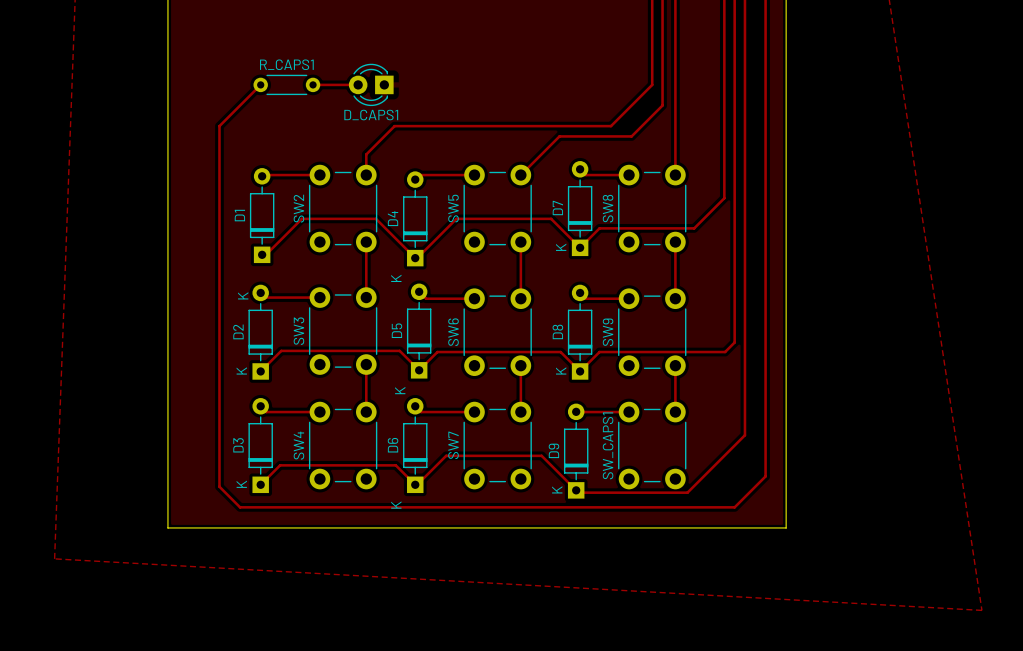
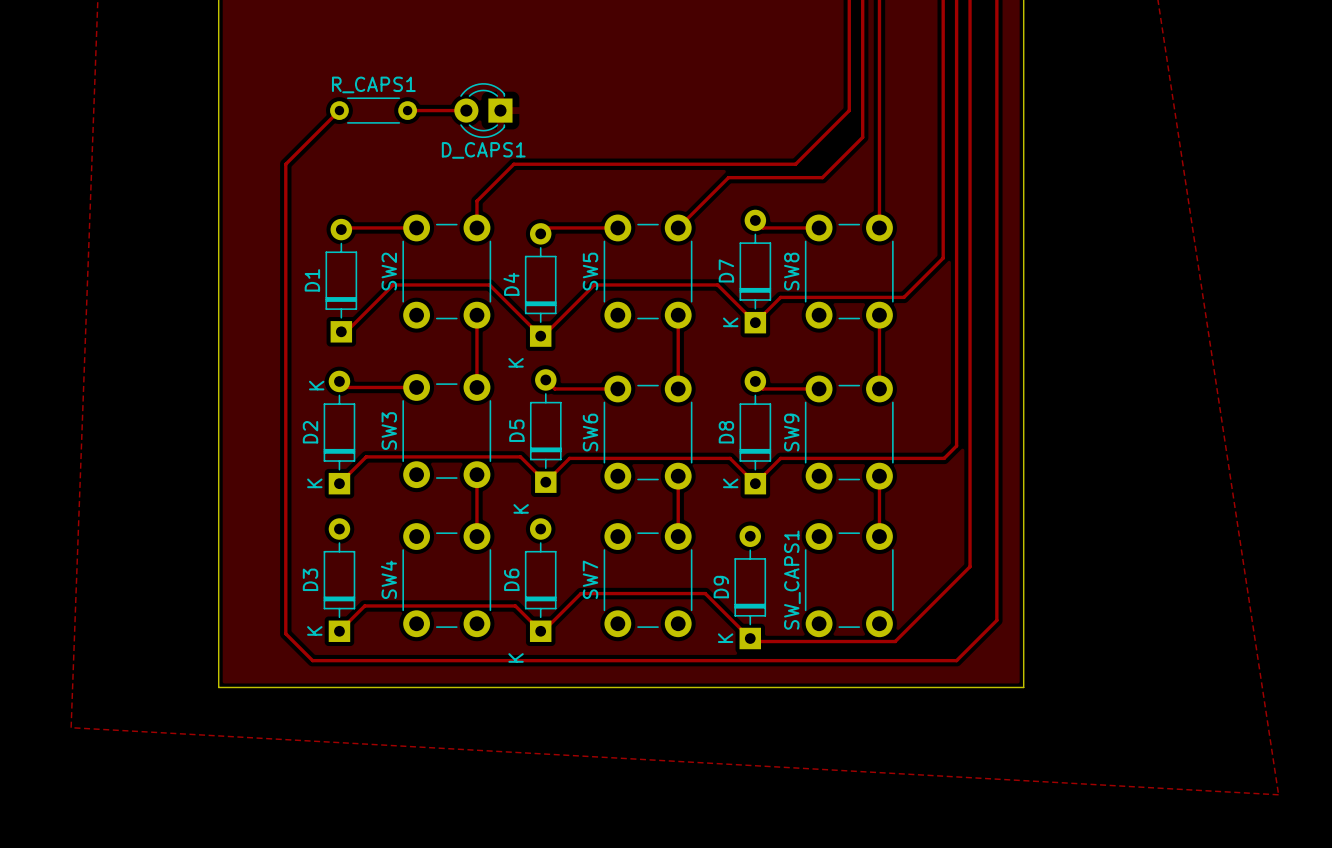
track: (260, 406) (266, 412) (319, 412) -> none
track: (415, 406) (421, 412) (474, 412) -> none
track: (576, 411) (629, 412) -> none

